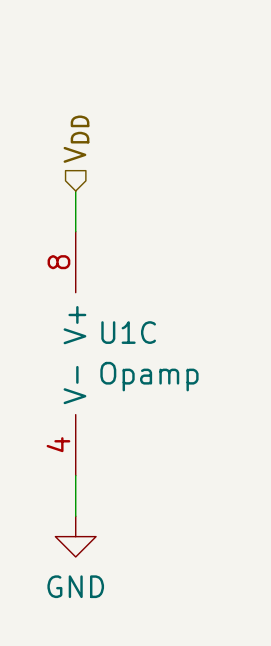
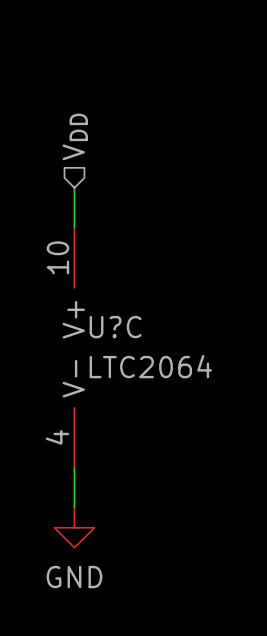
U1C pin number: 8 (58, 262) -> 10 (57, 257)
U1C name: U1C (128, 332) -> U?C (115, 327)
U1C value: Opamp (149, 376) -> LTC2064 (150, 366)

